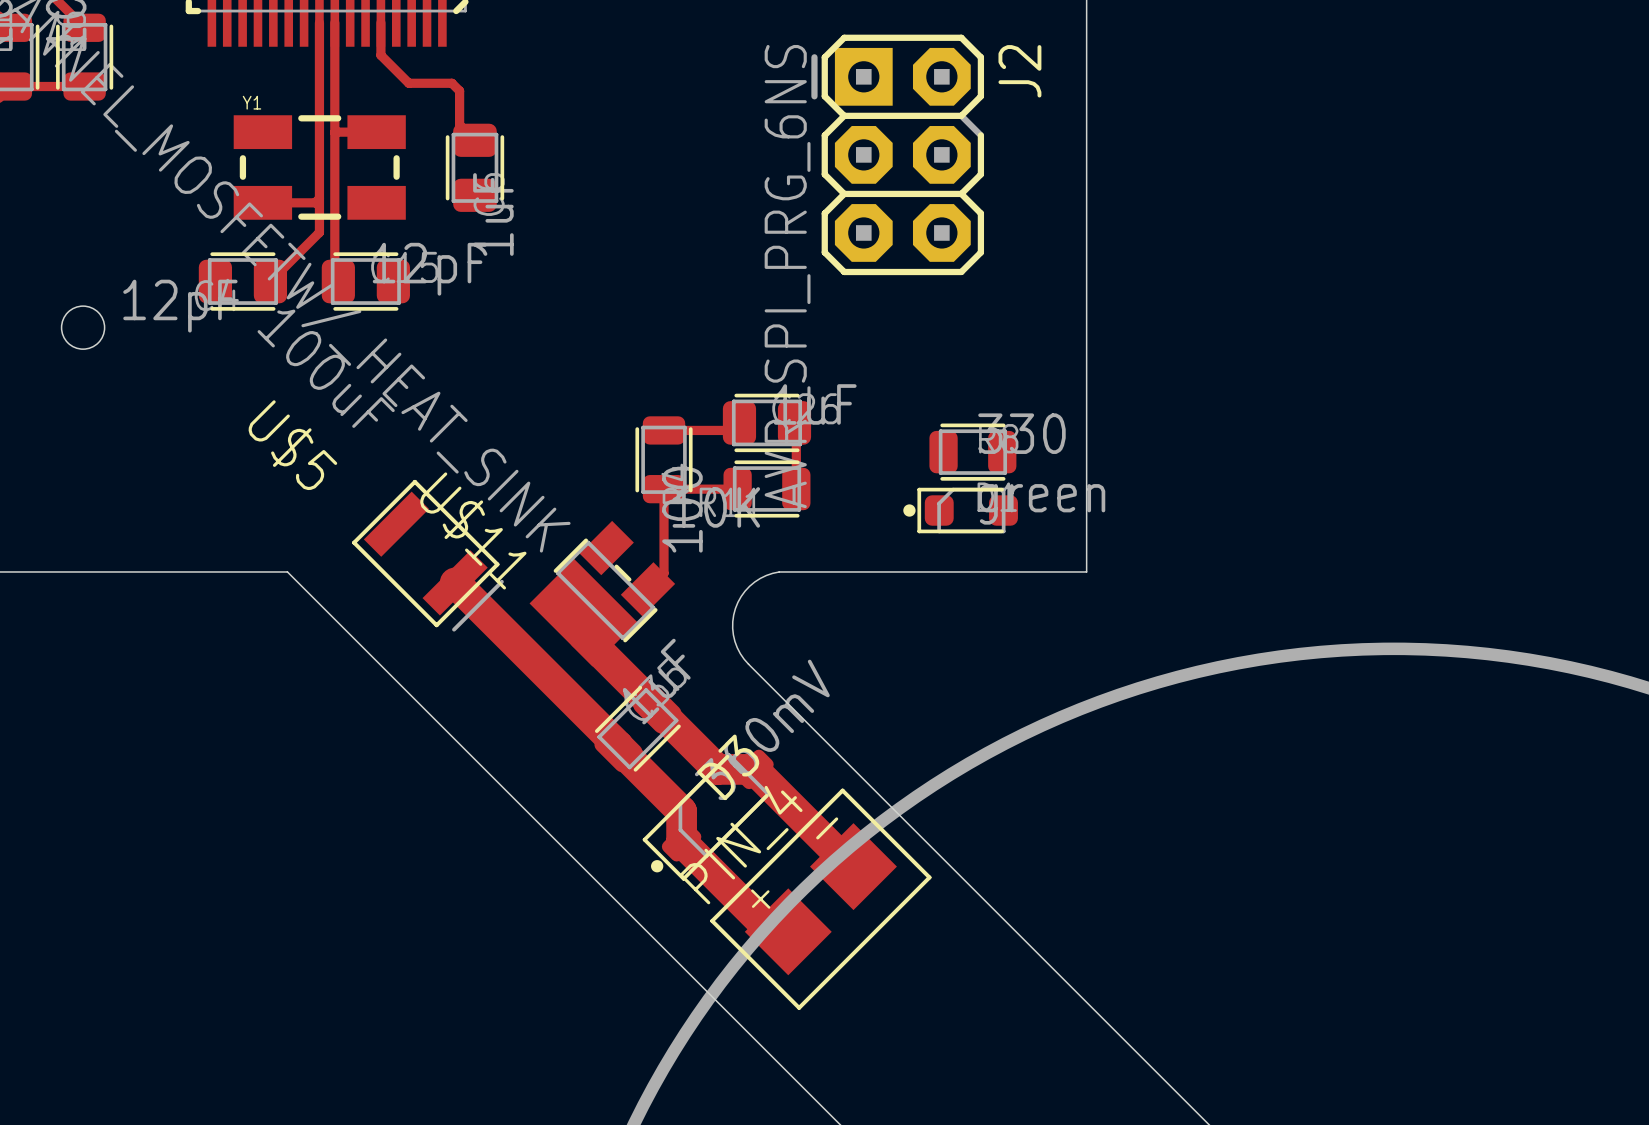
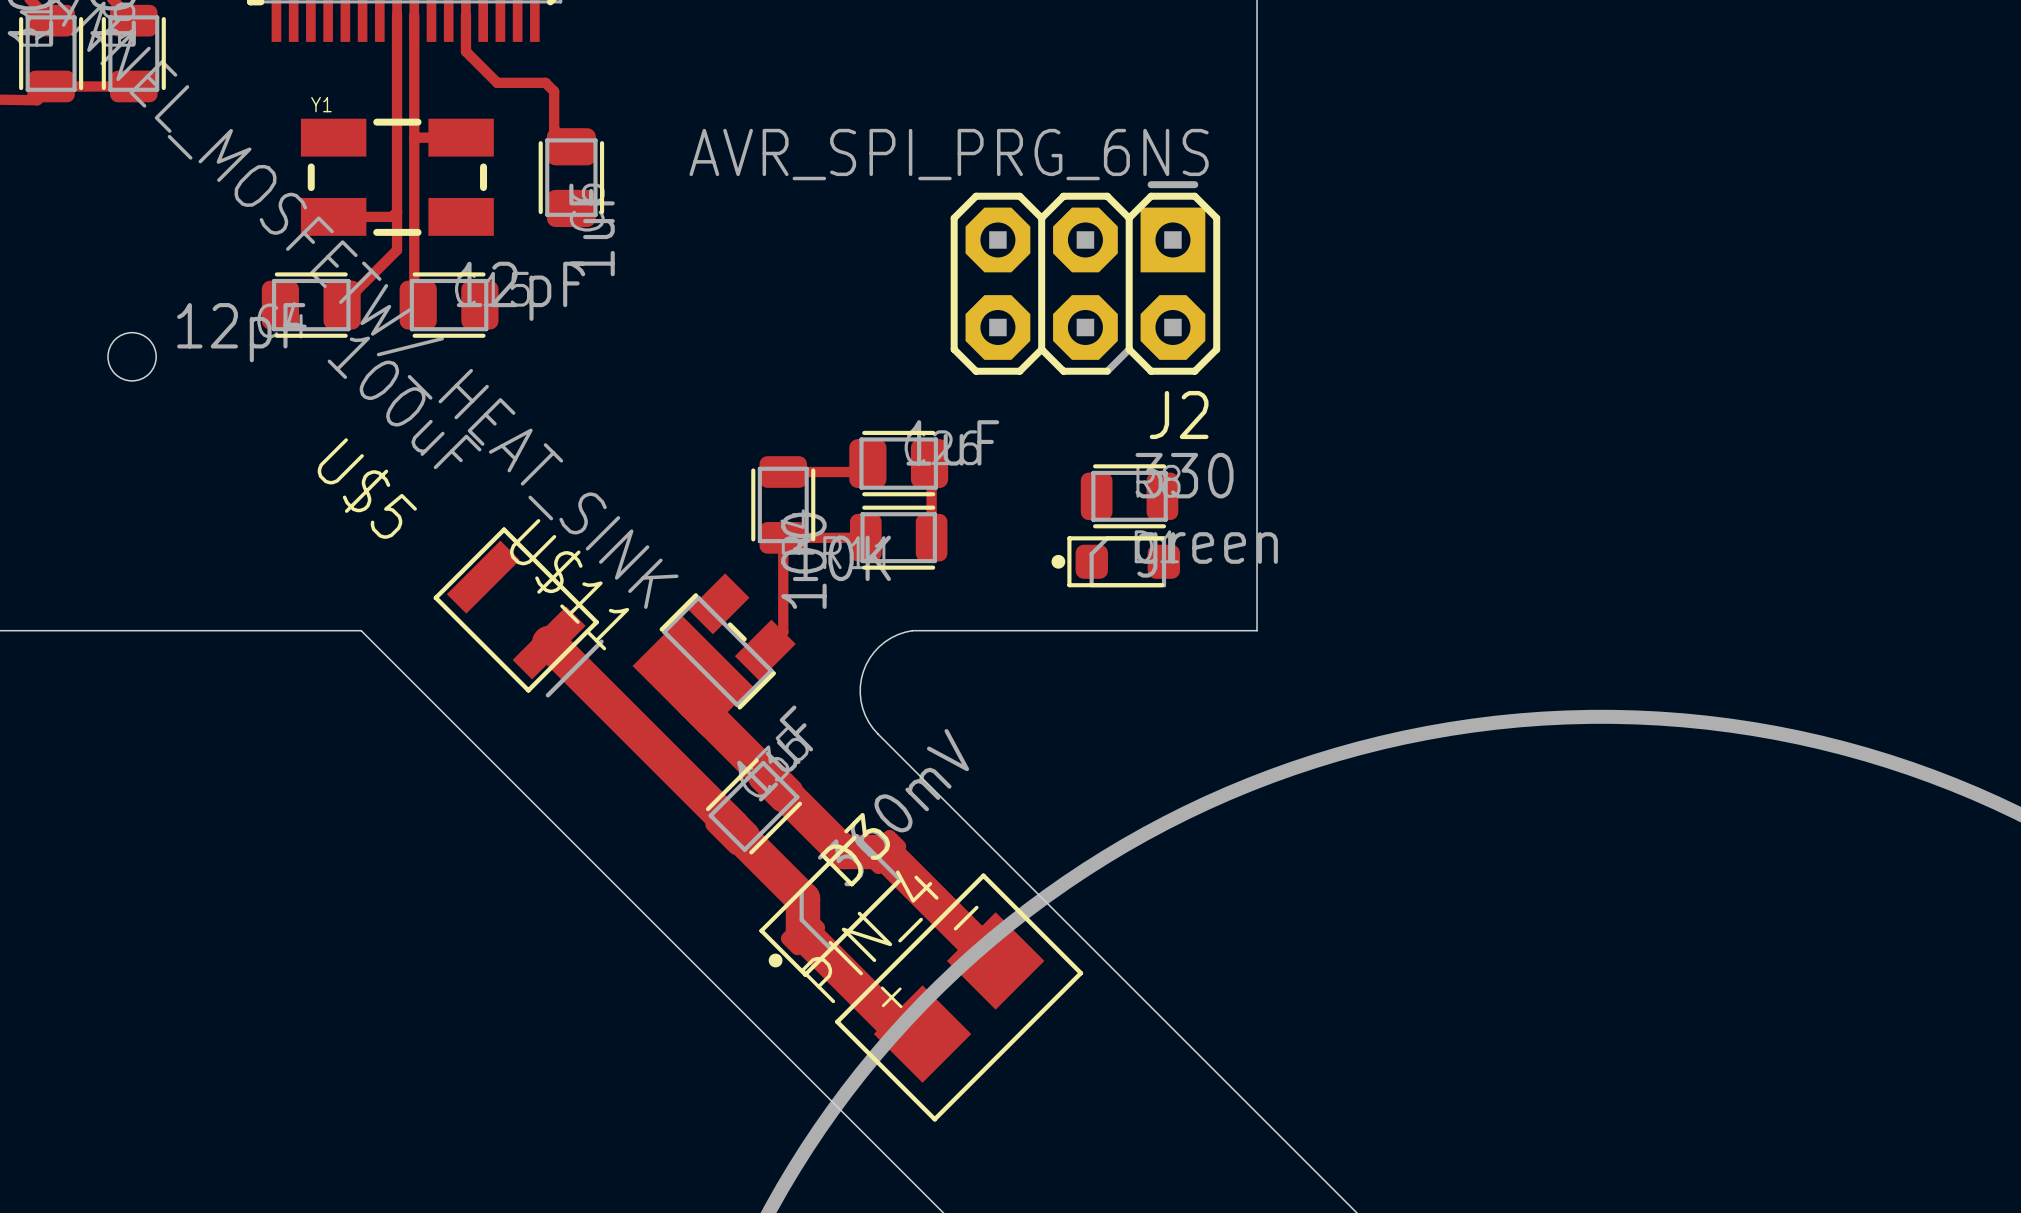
J2 rotation: 0° (897, 154) -> 90° clockwise (1085, 277)

